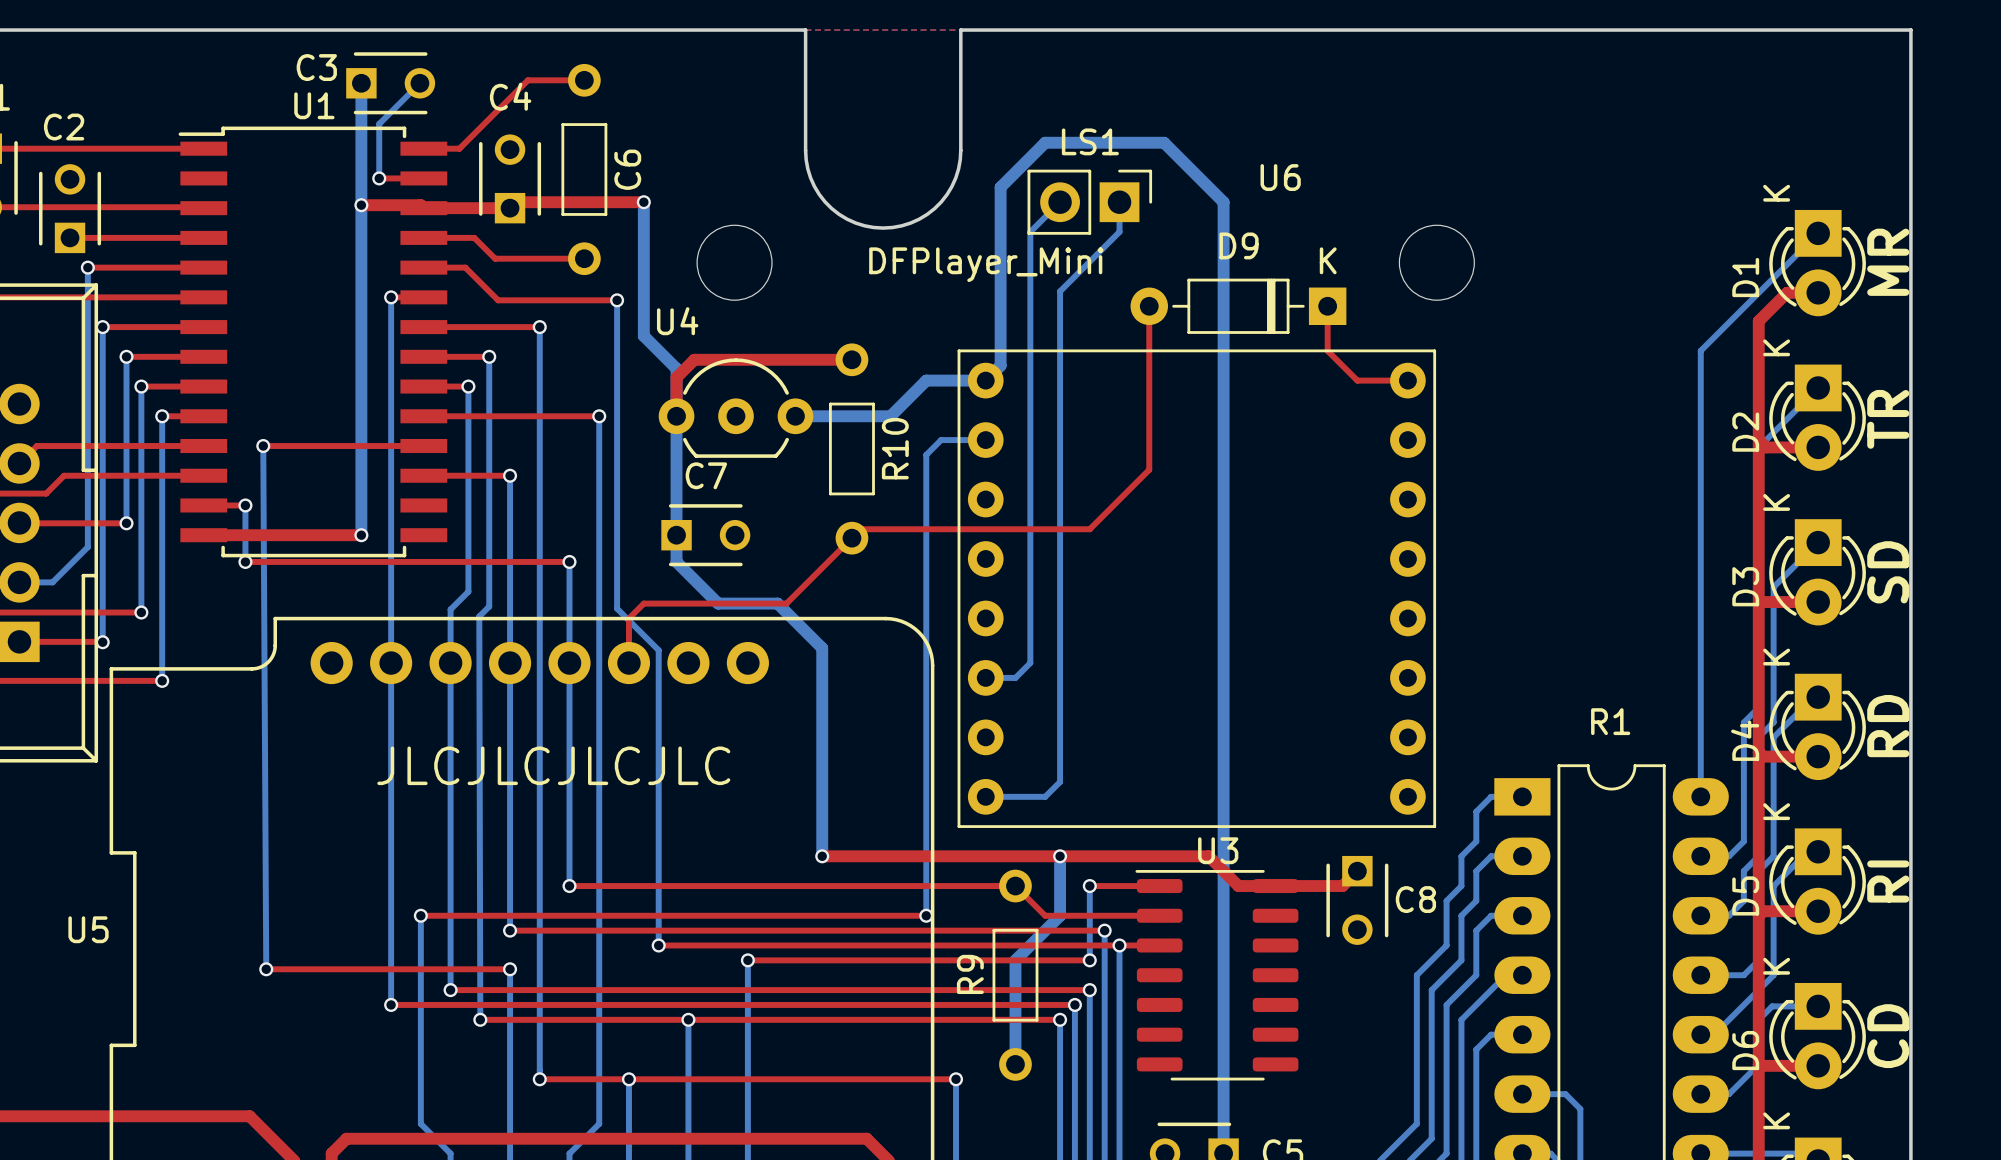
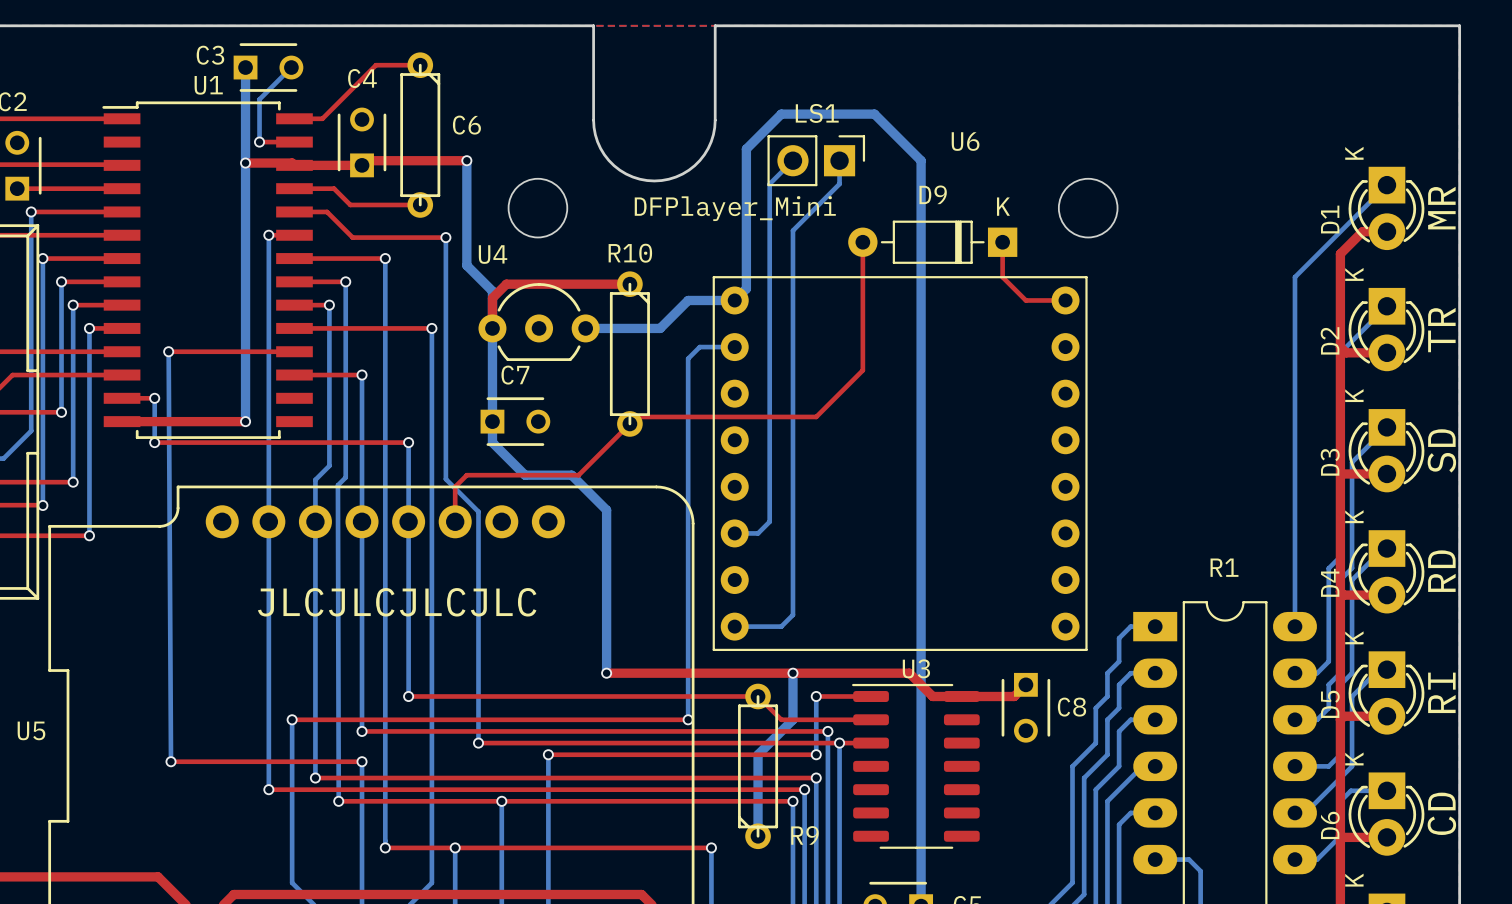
C6 footprint: [561, 63, 608, 276] -> [400, 52, 441, 218]
R10 footprint: [829, 343, 875, 555] -> [609, 271, 650, 437]
R10 name position: R10 (895, 448) -> R10 (630, 253)
R9 footprint: [992, 869, 1039, 1081] -> [738, 683, 779, 850]
R9 name position: R9 (970, 974) -> R9 (804, 835)

